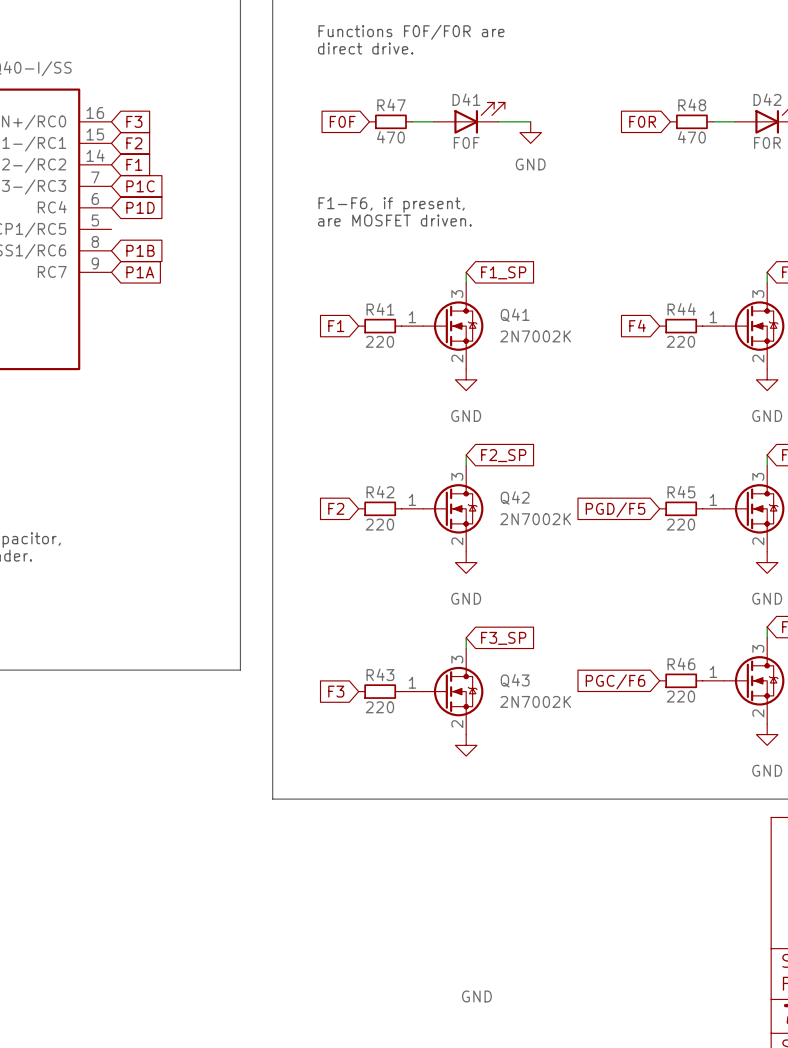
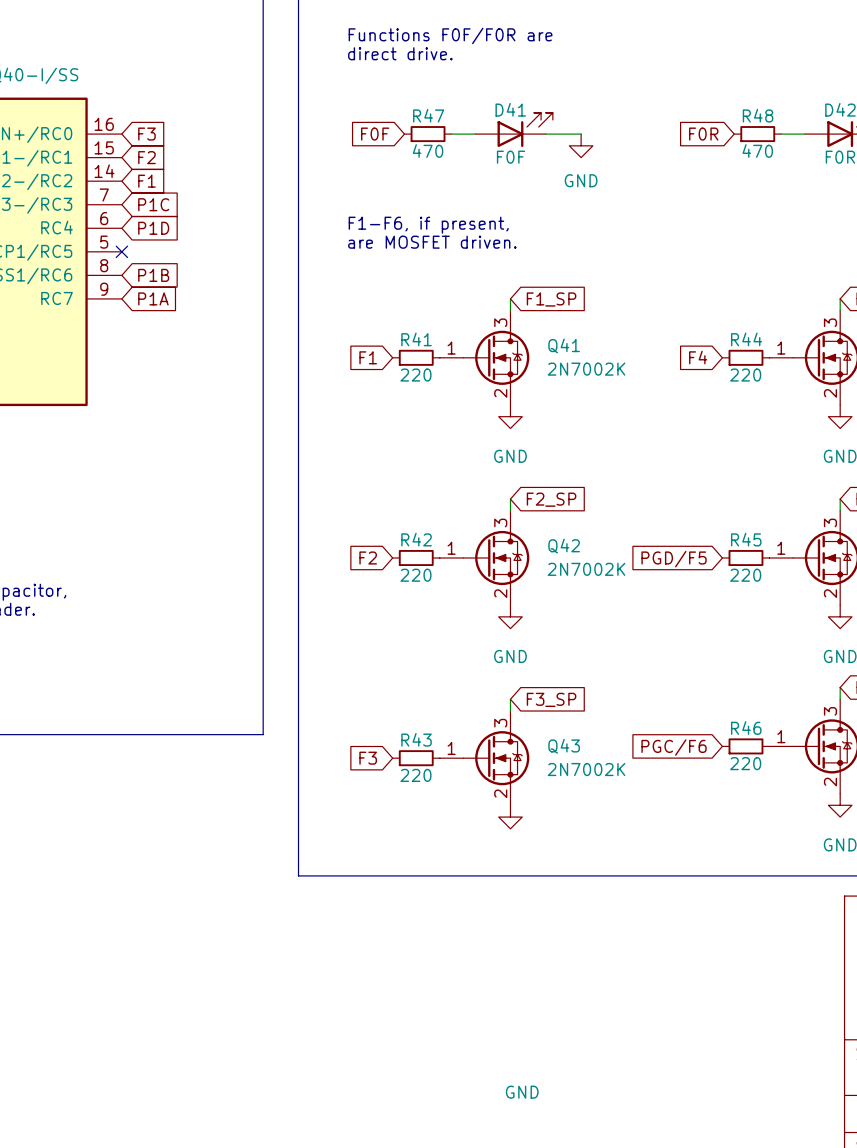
no-connect mark: none -> (121, 251)

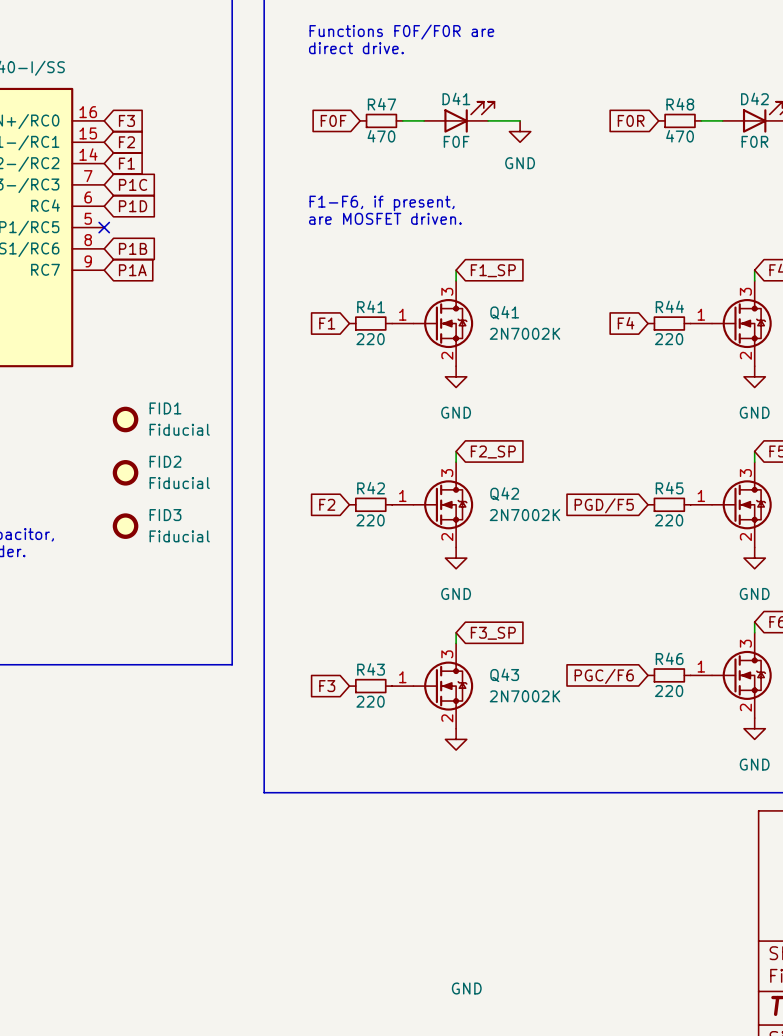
FID1: none -> Fiducial (125, 419)
FID2: none -> Fiducial (125, 472)
FID3: none -> Fiducial (125, 526)

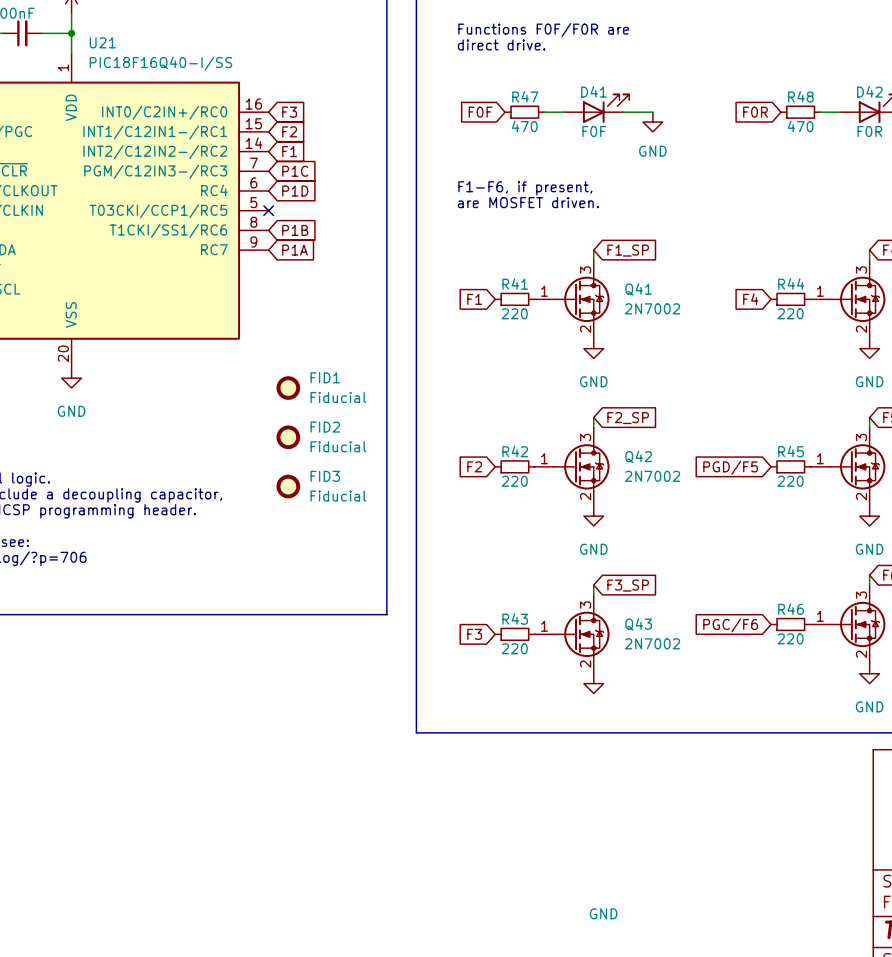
Q41 value: 2N7002K (524, 333) -> 2N7002 (652, 308)
Q42 value: 2N7002K (524, 515) -> 2N7002 (652, 476)
Q43 value: 2N7002K (524, 696) -> 2N7002 (652, 643)

